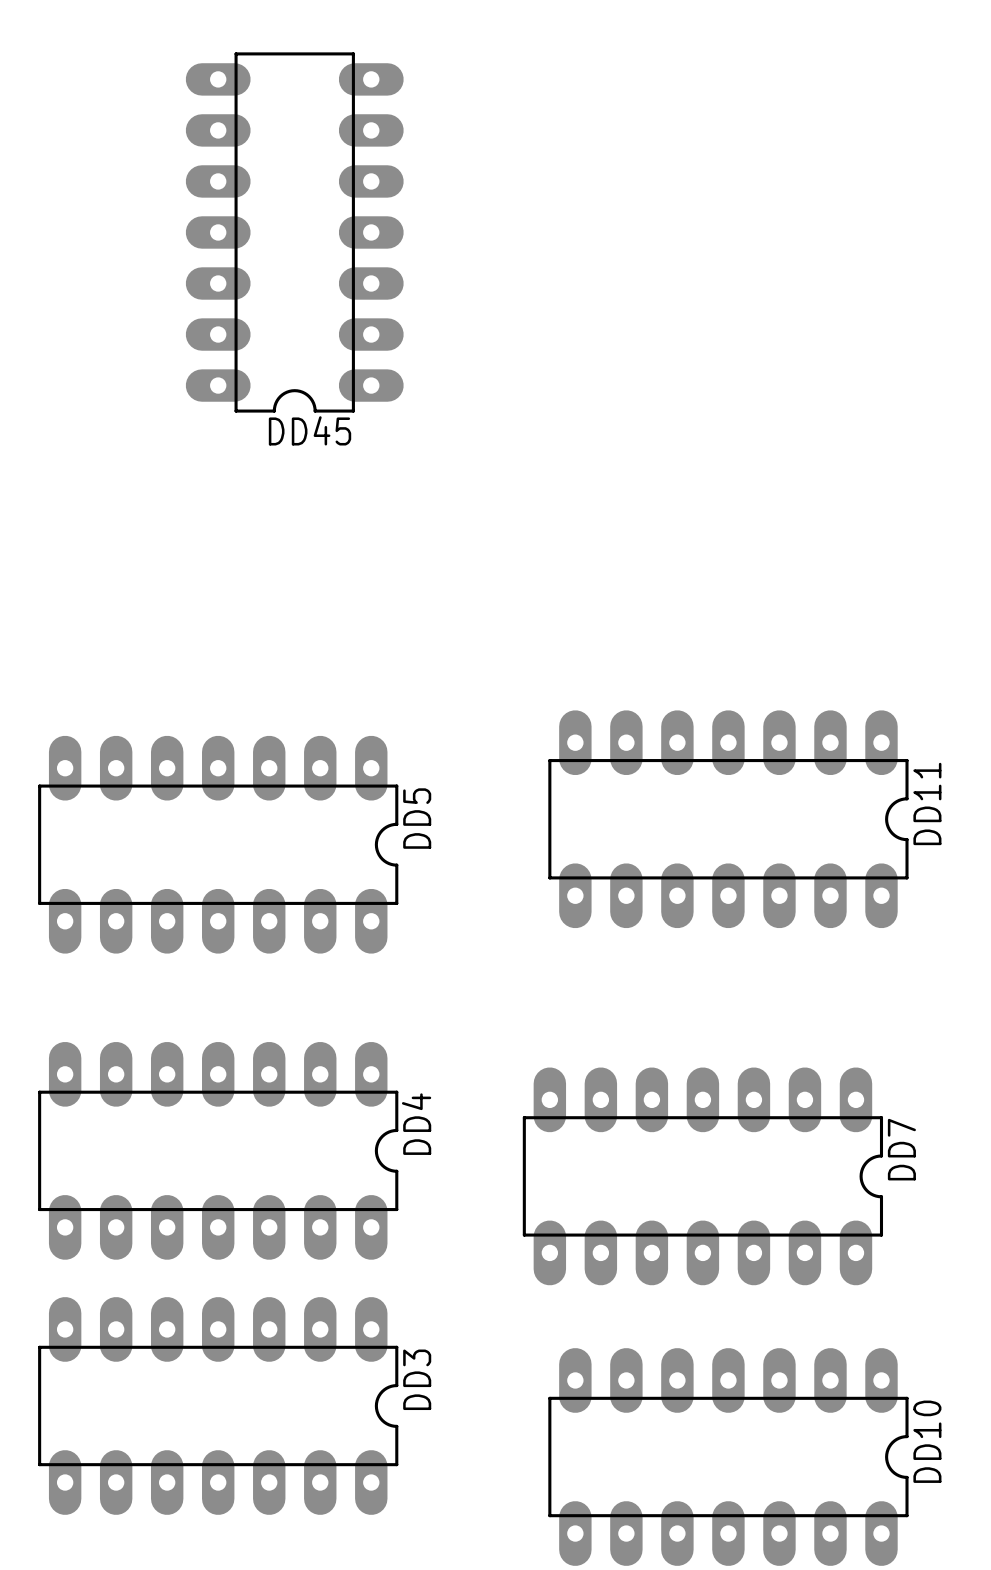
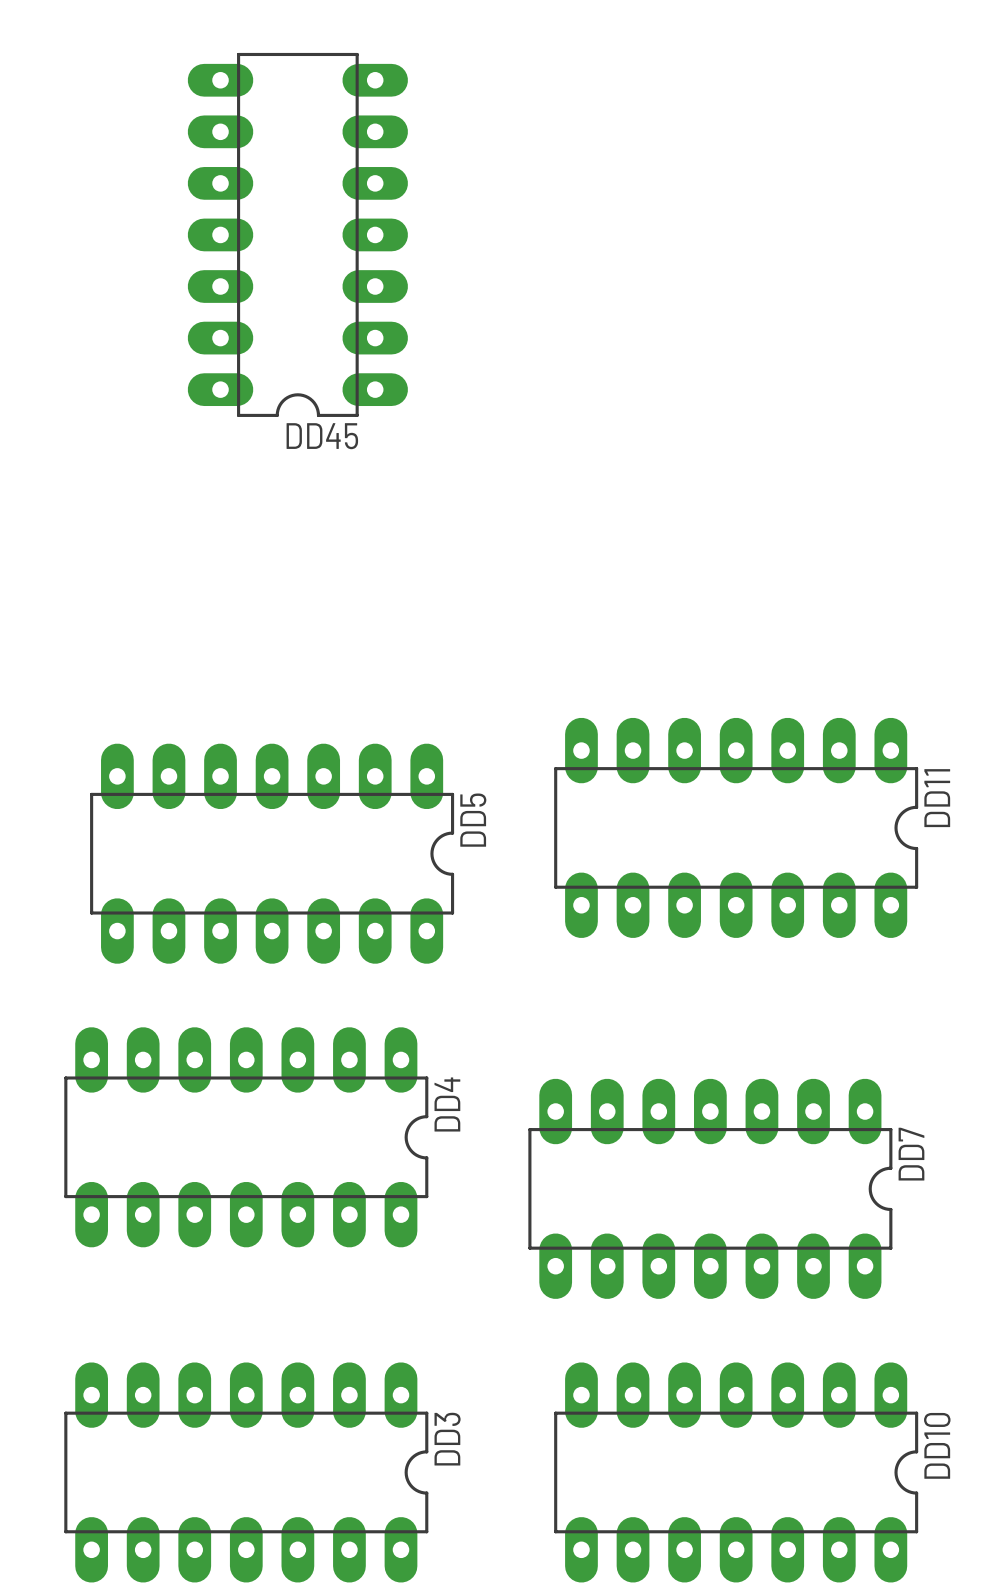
DD5 position: (218, 844) -> (272, 853)
DD4 position: (218, 1150) -> (246, 1137)
DD3 position: (218, 1405) -> (246, 1472)

